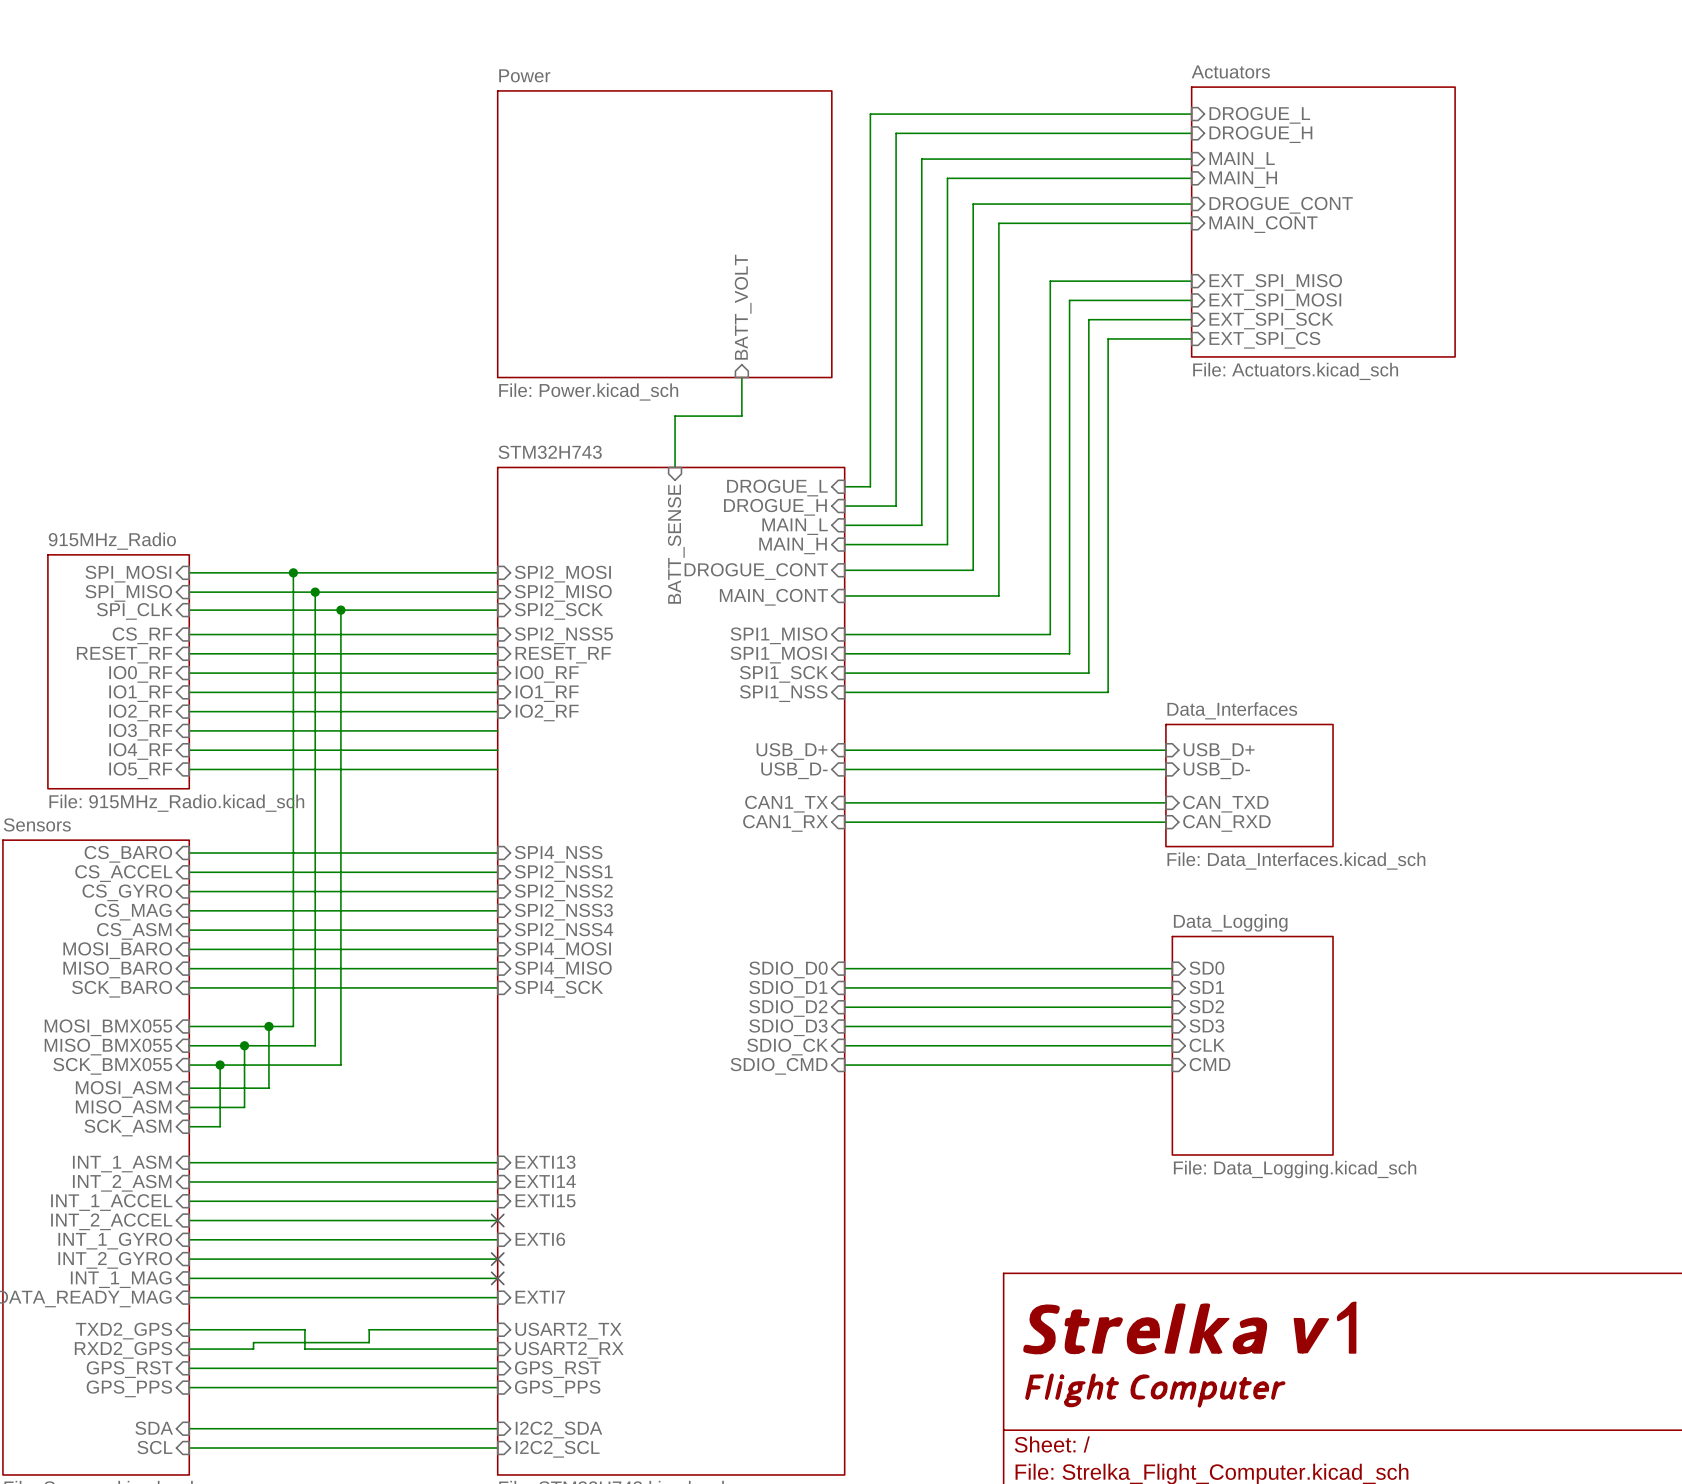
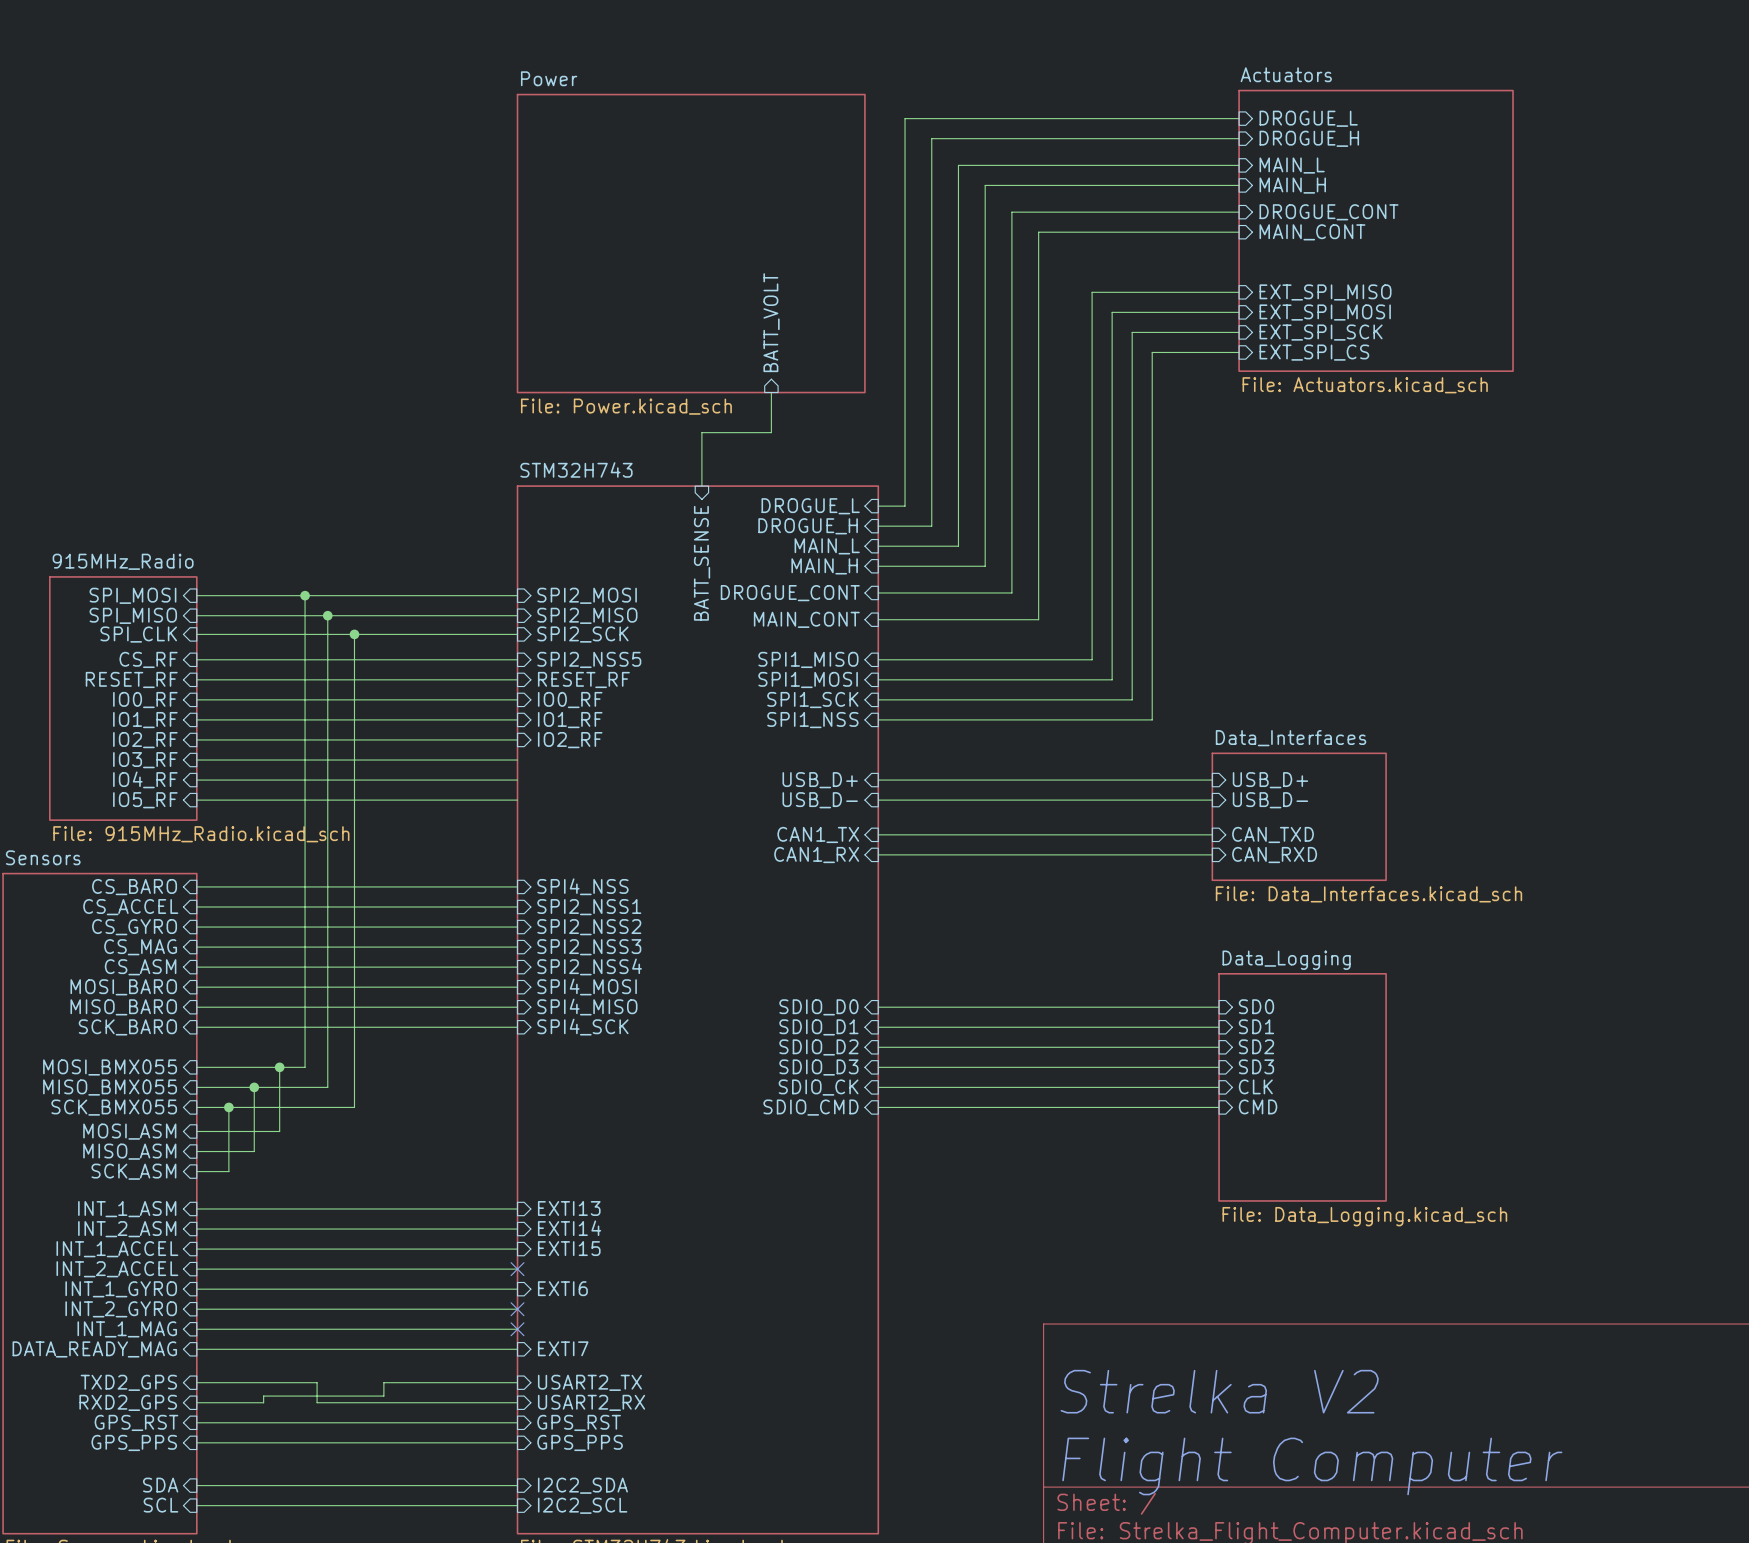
text: none -> Strelka V2 (1219, 1391)
power symbol: (1189, 1354) -> none
text: none -> Flight Computer (1312, 1466)

